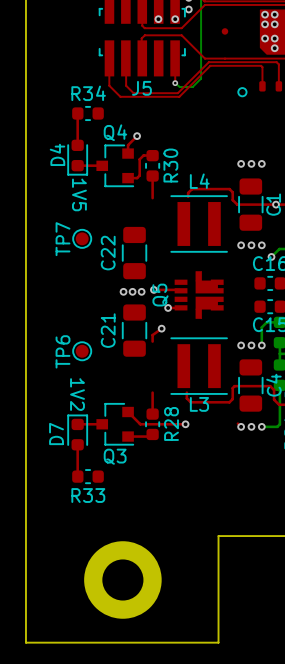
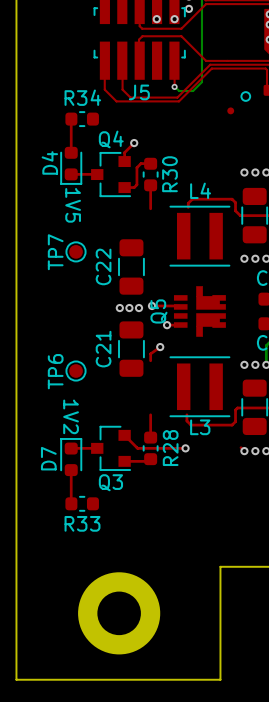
part position: (224, 31) -> (230, 110)

